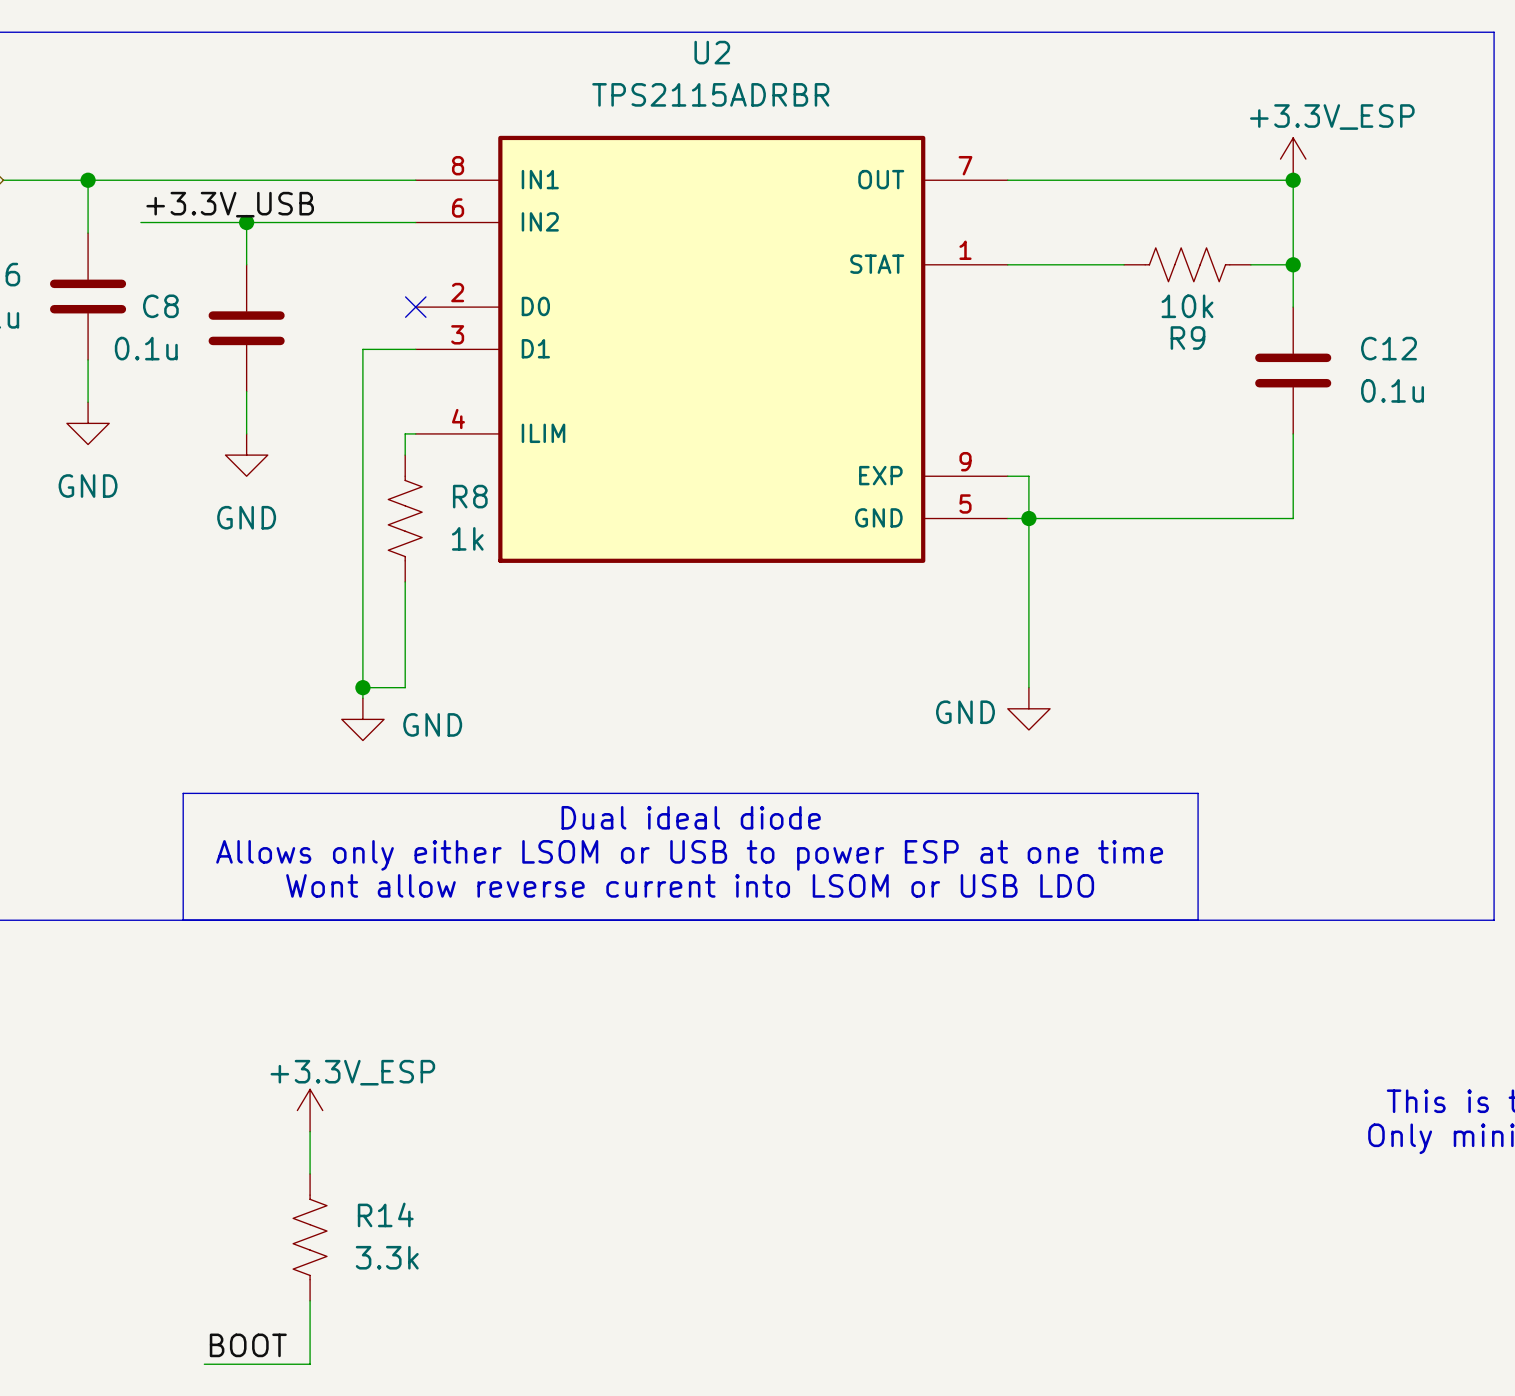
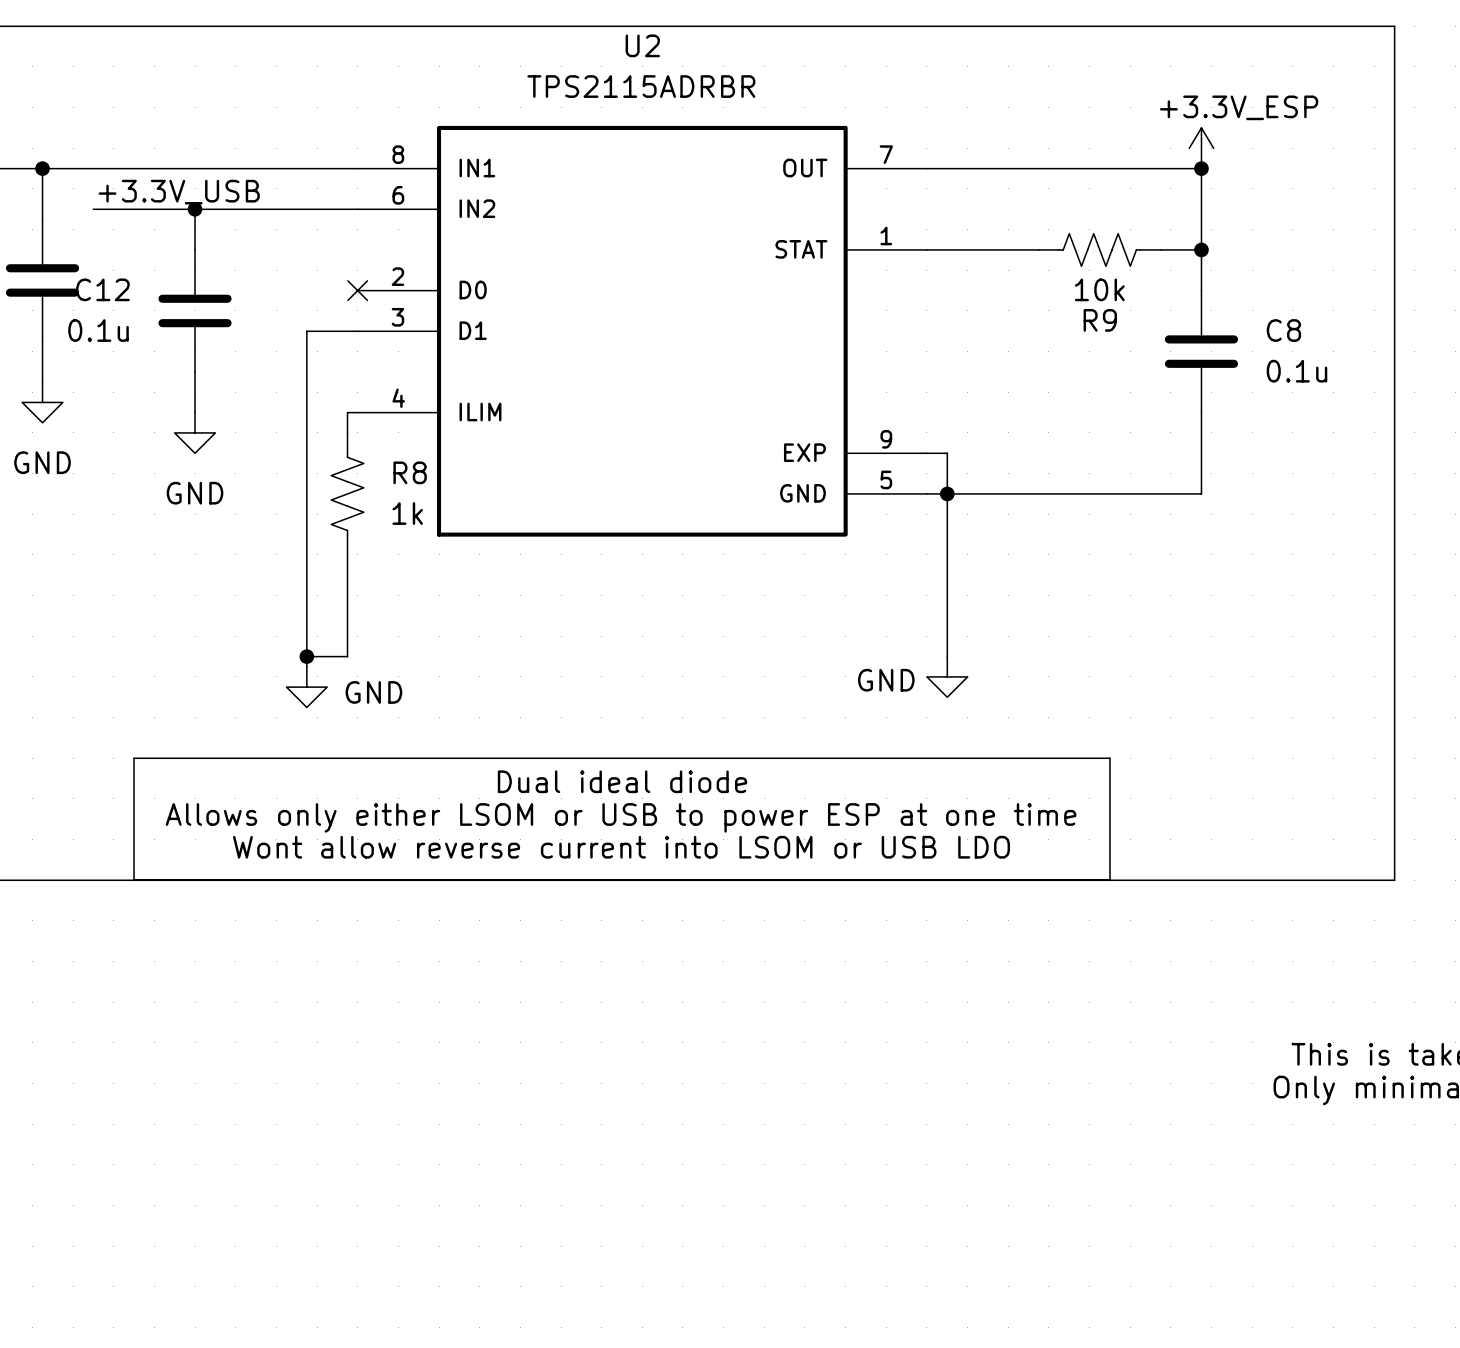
C8 name: C8 (160, 306) -> C12 (102, 289)
C12 name: C12 (1389, 348) -> C8 (1283, 330)
power symbol: +3.3V_ESP (310, 1110) -> none
wire: (310, 1131) (310, 1173) -> none
R14: 3.3k (310, 1237) -> none
wire: (310, 1300) (310, 1364) (204, 1364) -> none
label: BOOT (248, 1345) -> none

